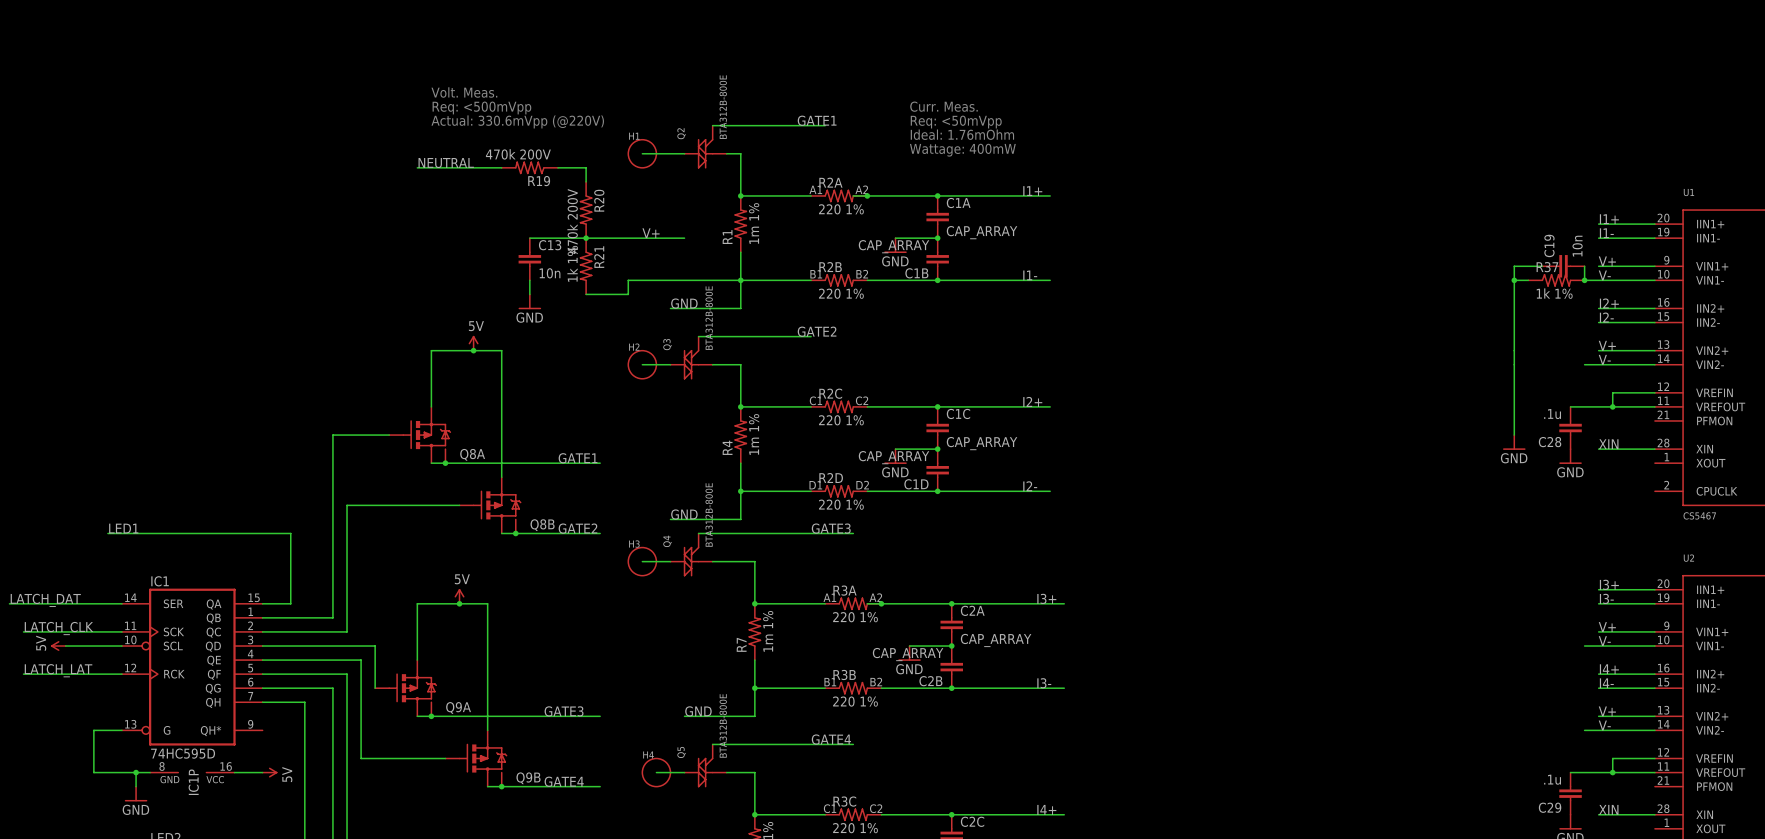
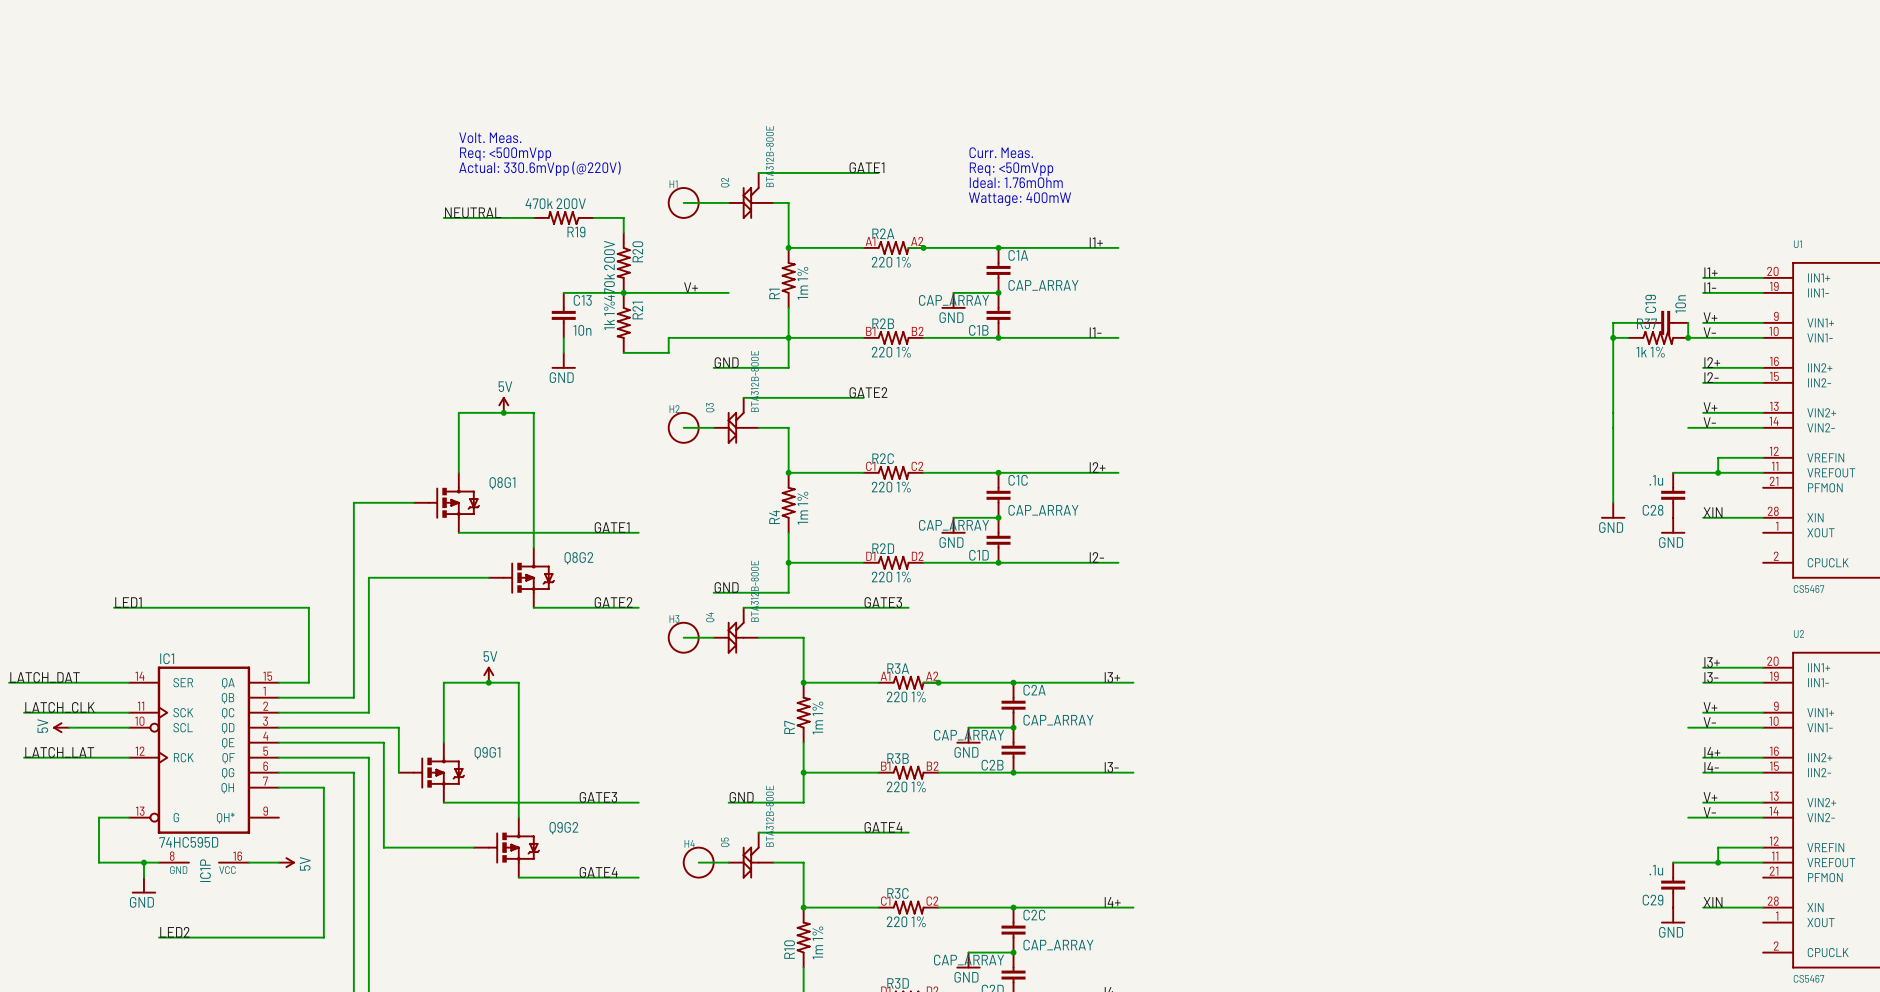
Q8A: (420, 435) -> none
Q8G1: none -> (446, 502)
junction: (445, 463) -> none
Q8B: (490, 505) -> none
Q8G2: none -> (521, 577)
junction: (515, 533) -> none
Q9A: (405, 688) -> none
Q9G1: none -> (431, 772)
junction: (431, 716) -> none
Q9B: (476, 758) -> none
Q9G2: none -> (506, 847)
junction: (501, 786) -> none

